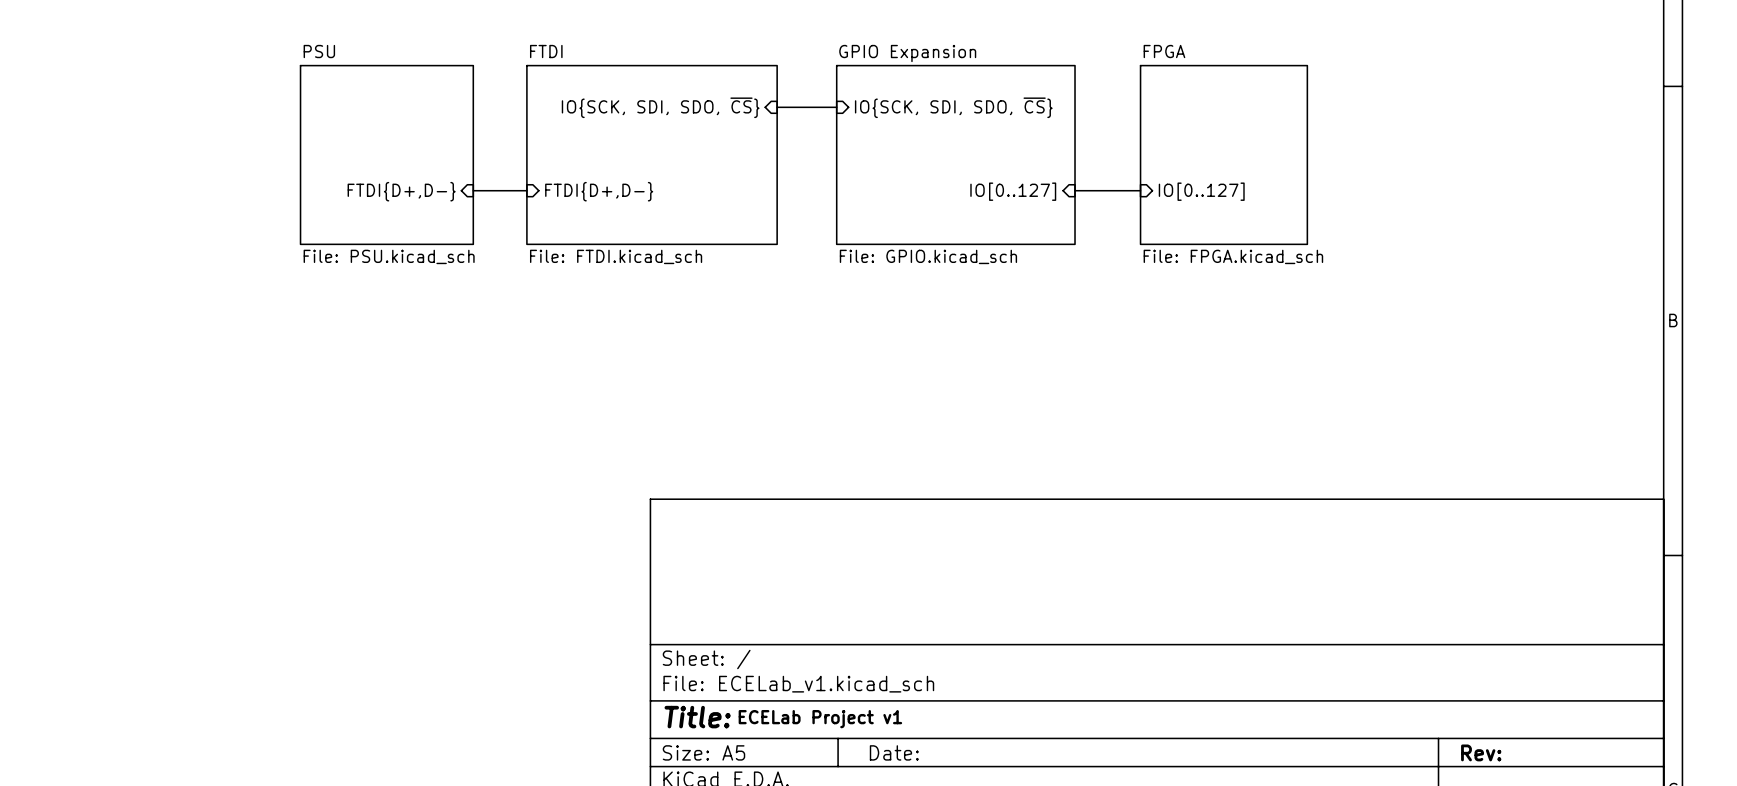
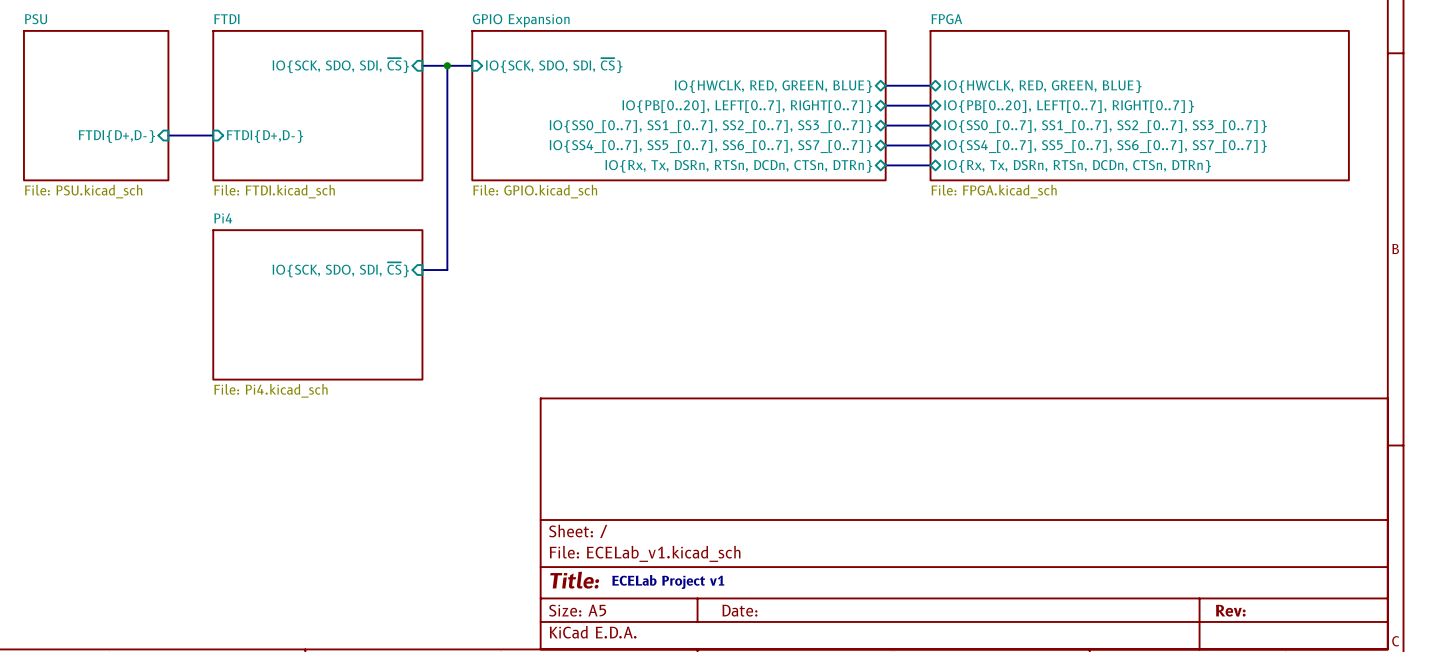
sheet pin: none -> IO{SCK, SDO, SDI, ~{CS}} (340, 65)
bus: none -> (422, 65) (472, 65)
bus: none -> (447, 65) (447, 270) (422, 270)
junction: none -> (447, 65)
sheet pin: none -> IO{SCK, SDO, SDI, ~{CS}} (554, 65)
sheet pin: IO{SCK, SDI, SDO, ~{CS}} (660, 107) -> none
bus: (777, 107) (836, 107) -> none
sheet pin: IO{SCK, SDI, SDO, ~{CS}} (953, 107) -> none
bus: none -> (885, 85) (930, 85)
sheet pin: none -> IO{HWCLK, RED, GREEN, BLUE} (773, 86)
sheet pin: none -> IO{HWCLK, RED, GREEN, BLUE} (1042, 86)
sheet PSU: none -> File: PSU.kicad_sch (96, 105)
sheet FTDI: none -> File: FTDI.kicad_sch (317, 105)
sheet GPIO Expansion: none -> File: GPIO.kicad_sch (678, 105)
sheet pin: none -> IO{PB[0..20], LEFT[0..7], RIGHT[0..7]} (747, 106)
bus: none -> (885, 105) (930, 105)
sheet pin: none -> IO{PB[0..20], LEFT[0..7], RIGHT[0..7]} (1069, 106)
sheet FPGA: none -> File: FPGA.kicad_sch (1139, 105)
sheet PSU: File: PSU.kicad_sch (386, 154) -> none
sheet FTDI: File: FTDI.kicad_sch (652, 154) -> none
sheet GPIO Expansion: File: GPIO.kicad_sch (955, 154) -> none
sheet FPGA: File: FPGA.kicad_sch (1223, 154) -> none
bus: none -> (885, 125) (930, 125)
sheet pin: none -> IO{SS0_[0..7], SS1_[0..7], SS2_[0..7], SS3_[0..7]} (710, 126)
sheet pin: none -> IO{SS0_[0..7], SS1_[0..7], SS2_[0..7], SS3_[0..7]} (1105, 126)
bus: none -> (168, 135) (213, 135)
sheet pin: none -> FTDI{D+,D-} (116, 136)
bus: (473, 190) (526, 190) -> none
bus: (1075, 190) (1140, 190) -> none
sheet pin rotation: 0° (401, 191) -> 180° (265, 136)
sheet pin: FTDI{D+,D-} (599, 191) -> none
sheet pin: IO[0..127] (1013, 191) -> none
sheet pin: IO[0..127] (1201, 191) -> none
bus: none -> (885, 145) (930, 145)
sheet pin: none -> IO{SS4_[0..7], SS5_[0..7], SS6_[0..7], SS7_[0..7]} (710, 146)
sheet pin: none -> IO{SS4_[0..7], SS5_[0..7], SS6_[0..7], SS7_[0..7]} (1105, 146)
bus: none -> (885, 165) (930, 165)
sheet pin: none -> IO{Rx, Tx, DSRn, RTSn, DCDn, CTSn, DTRn} (738, 166)
sheet pin: none -> IO{Rx, Tx, DSRn, RTSn, DCDn, CTSn, DTRn} (1077, 166)
sheet pin: none -> IO{SCK, SDO, SDI, ~{CS}} (340, 269)
sheet Pi4: none -> File: Pi4.kicad_sch (317, 304)

